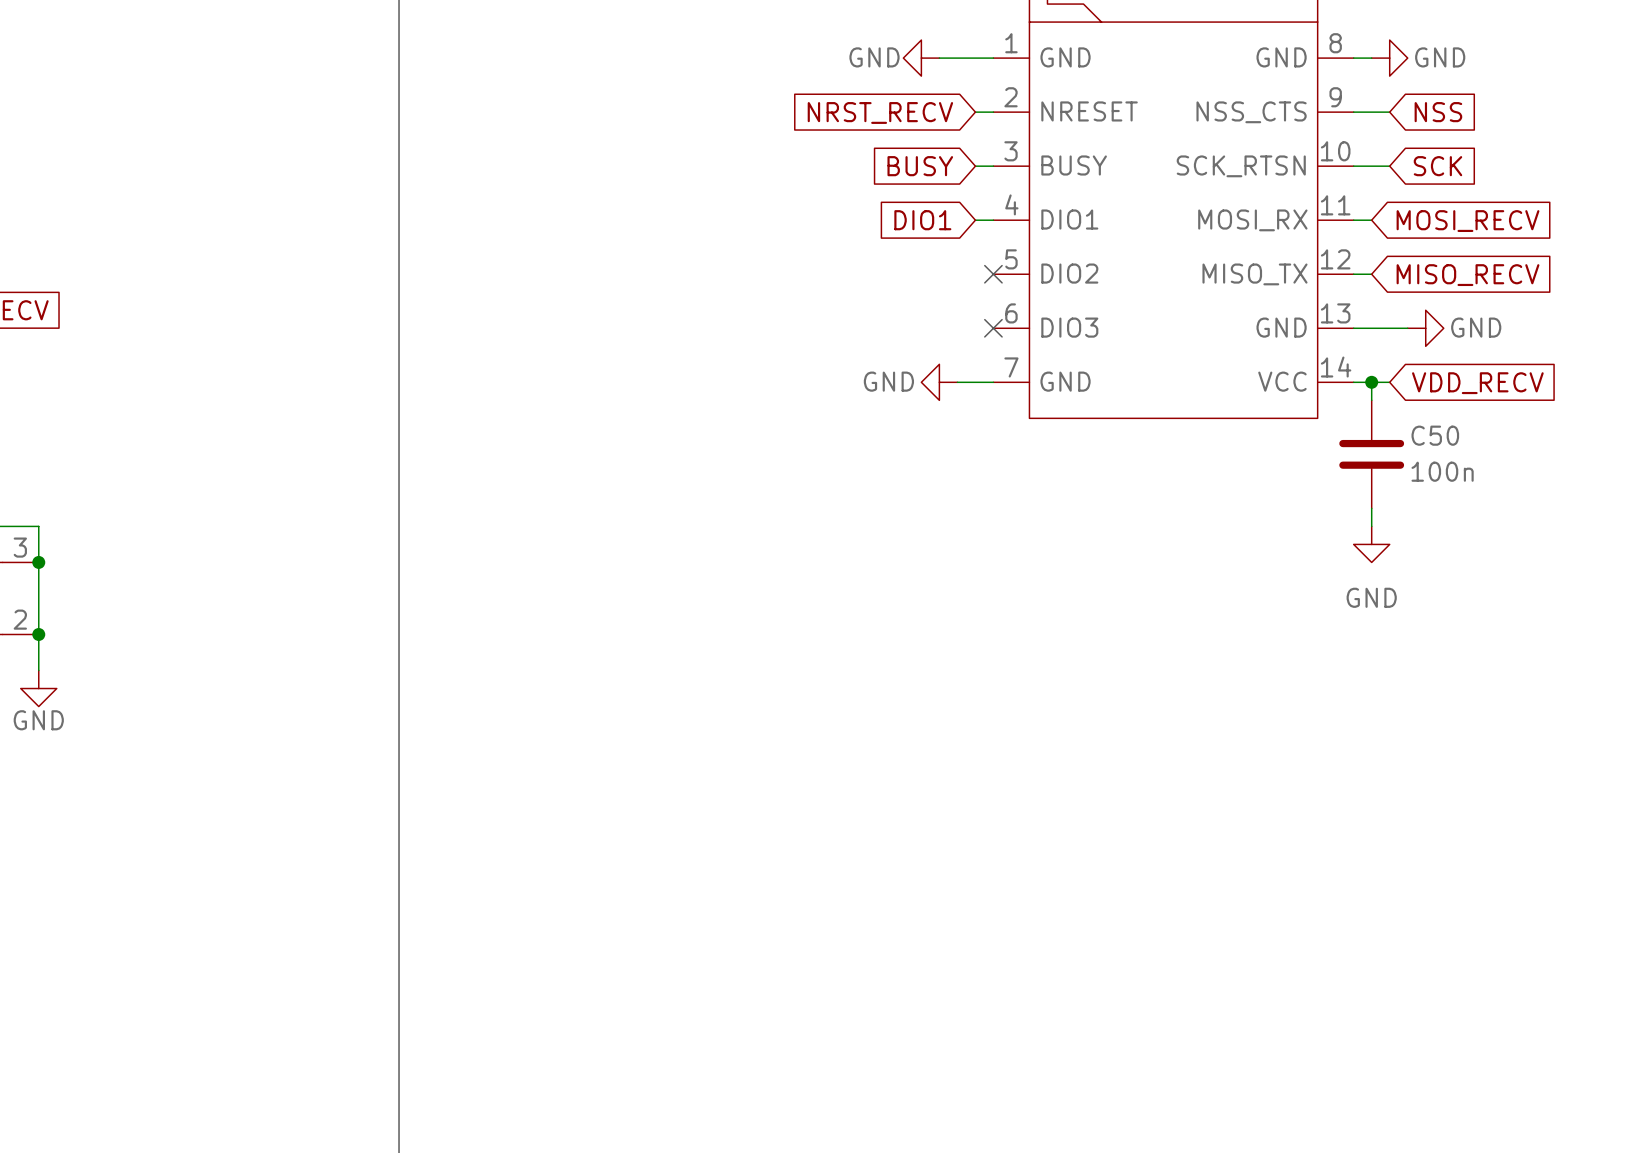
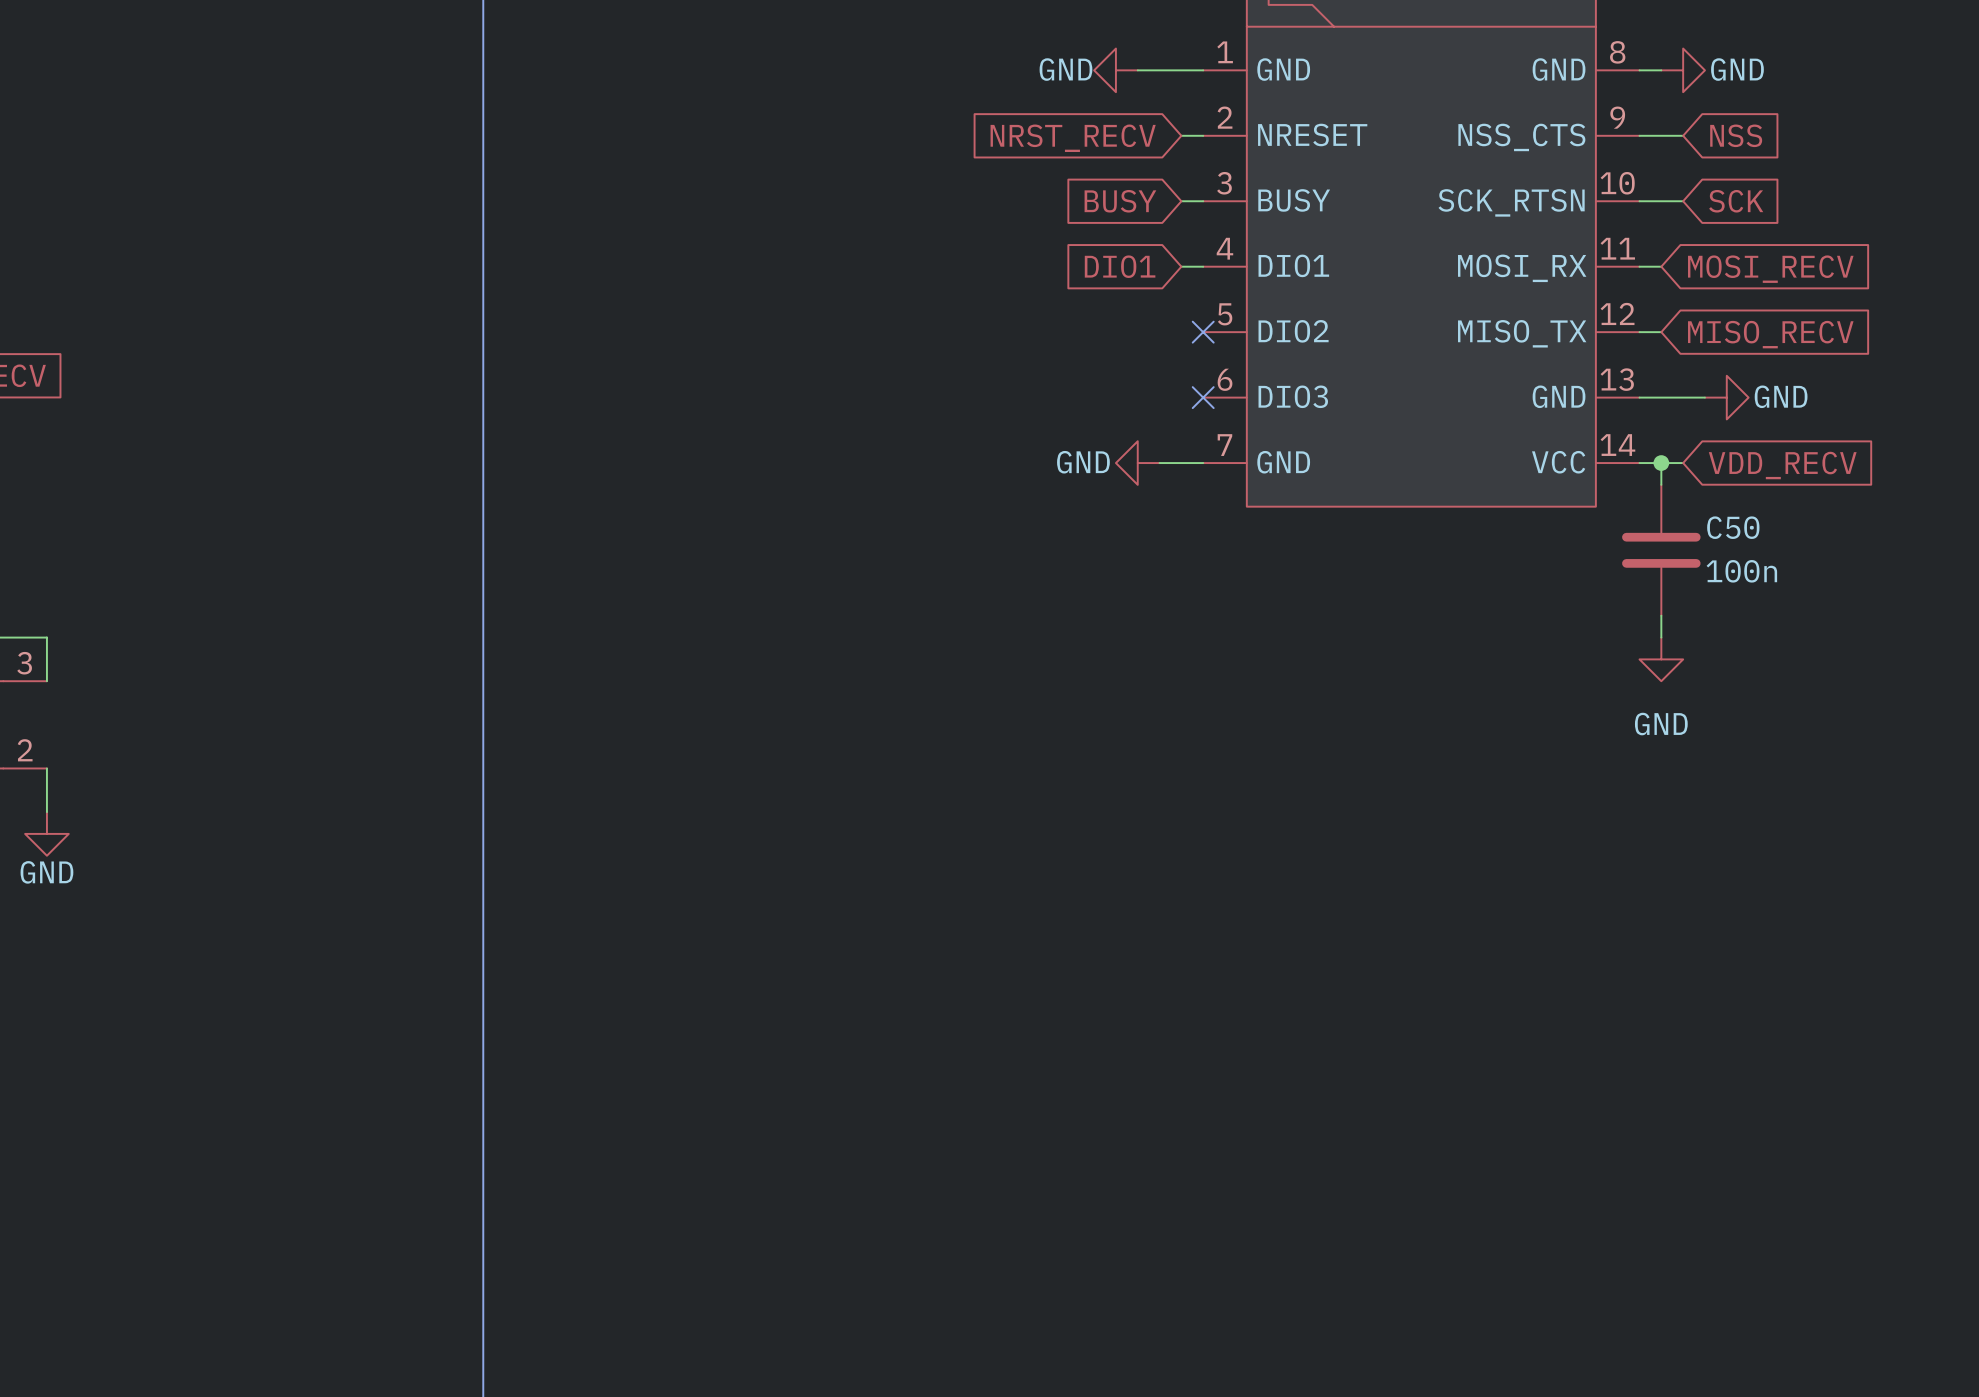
wire: (38, 562) (38, 634) -> none
junction: (38, 562) -> none
junction: (38, 634) -> none

